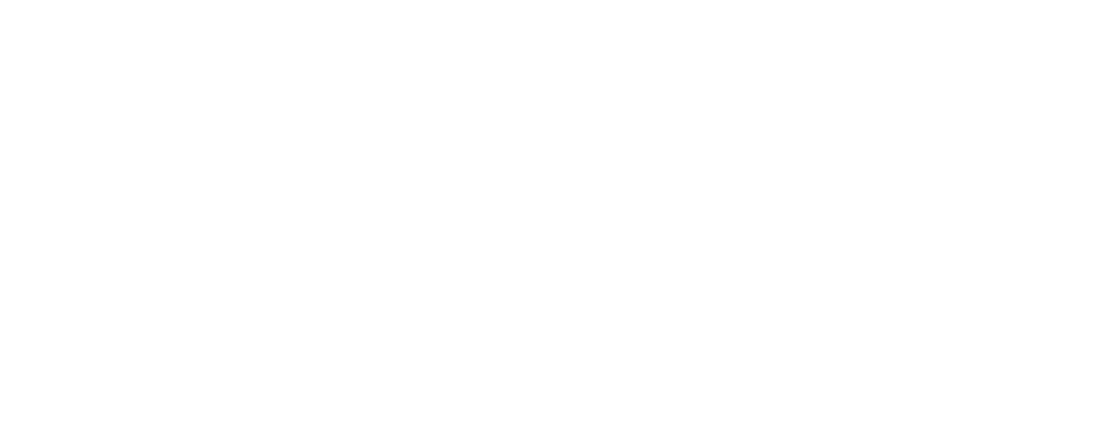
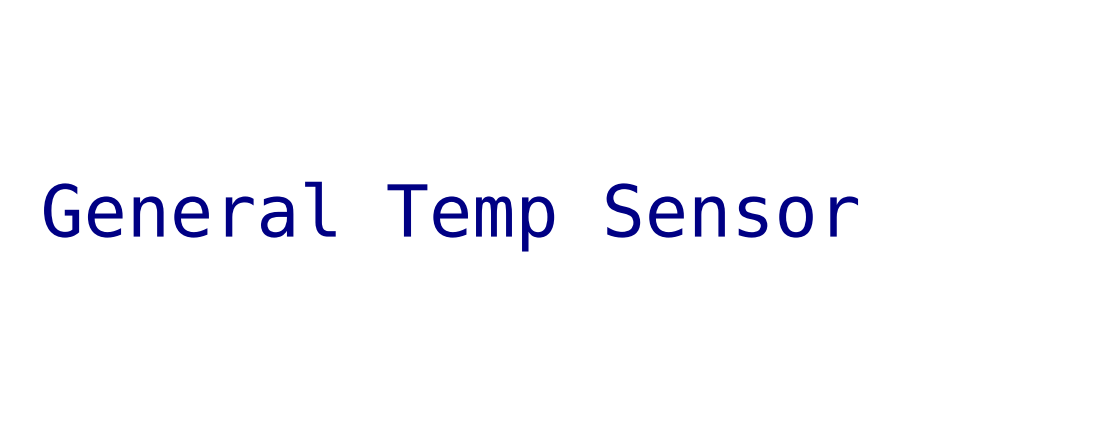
text: none -> General Temp Sensor (451, 216)

